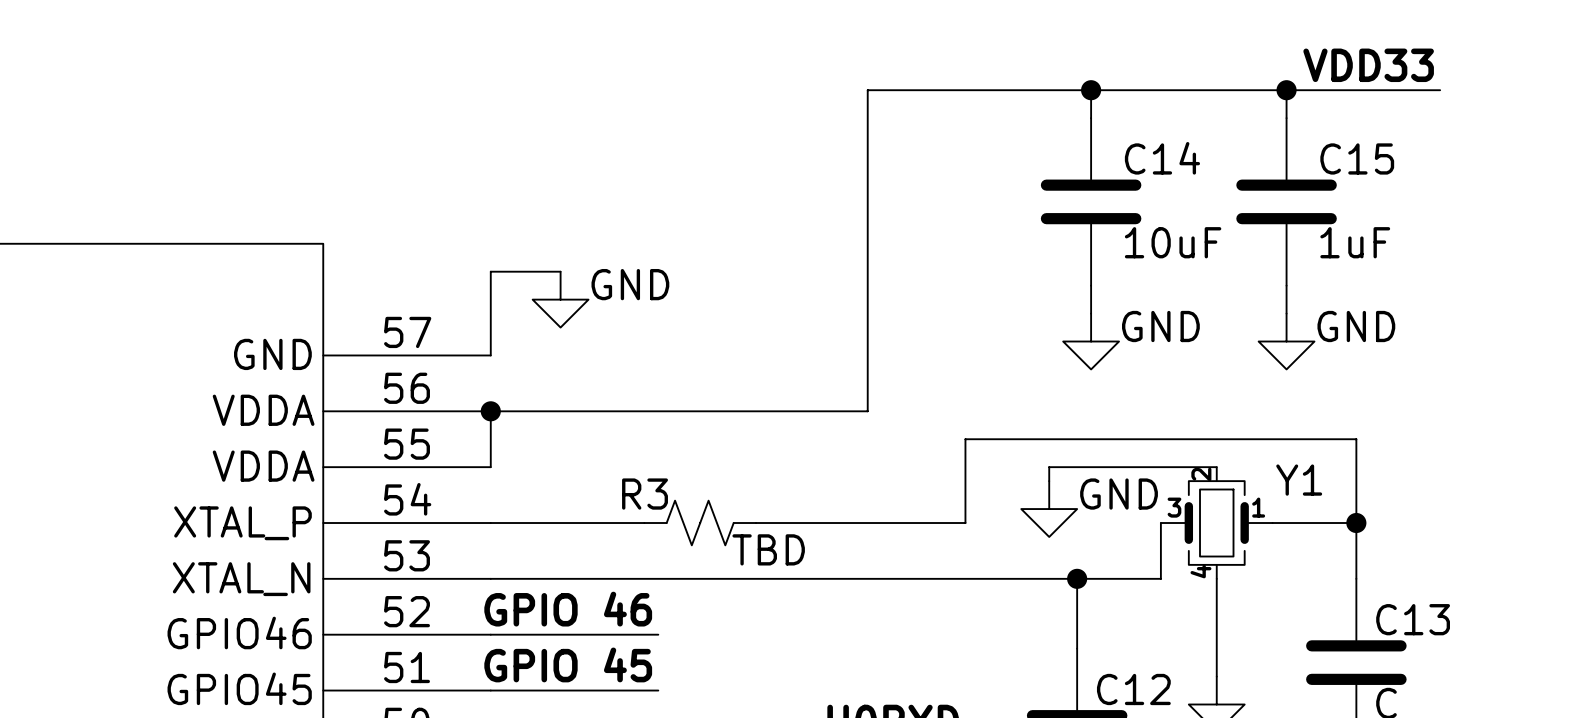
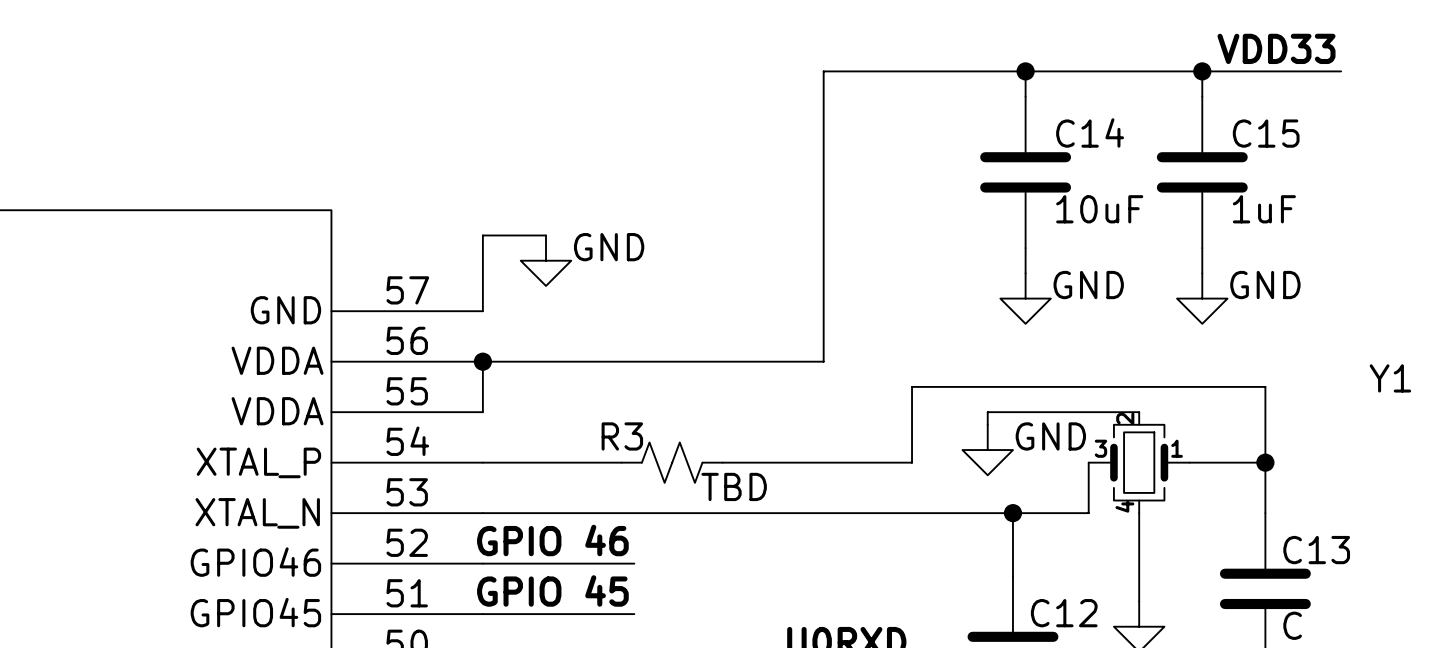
Y1 name position: Y1 (1299, 480) -> Y1 (1390, 378)

